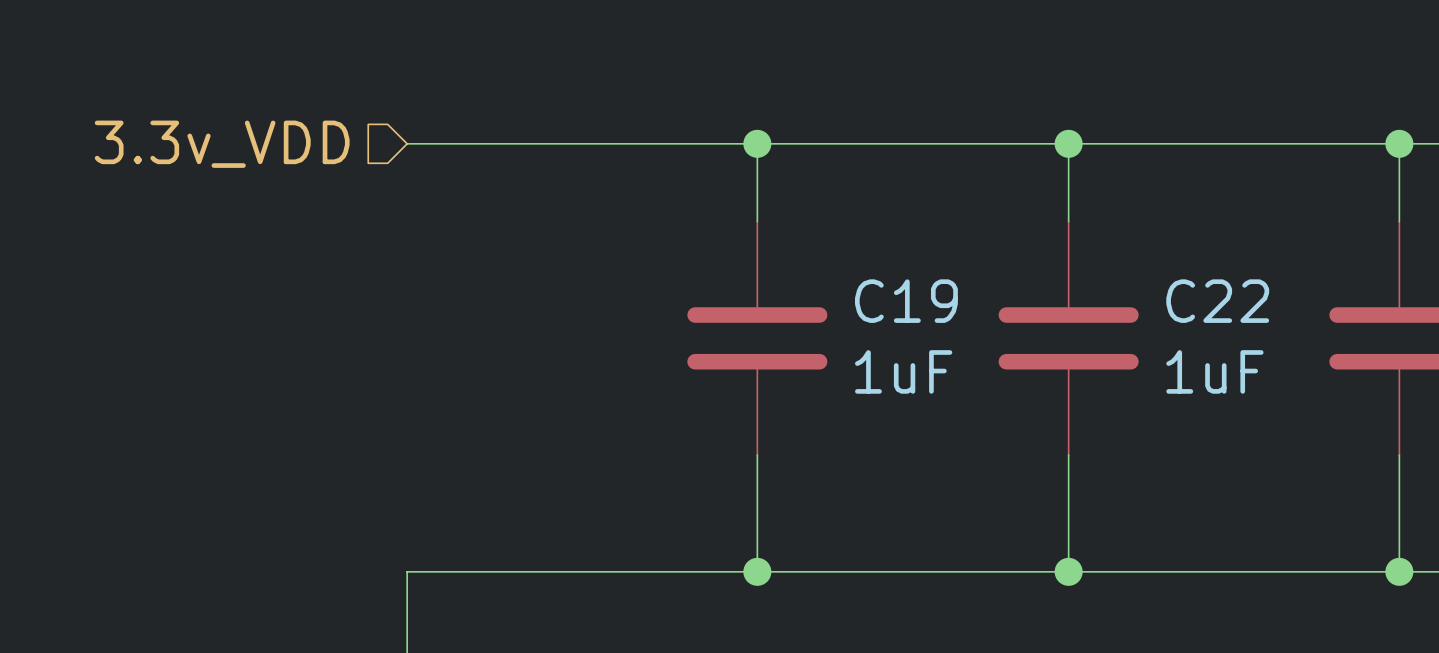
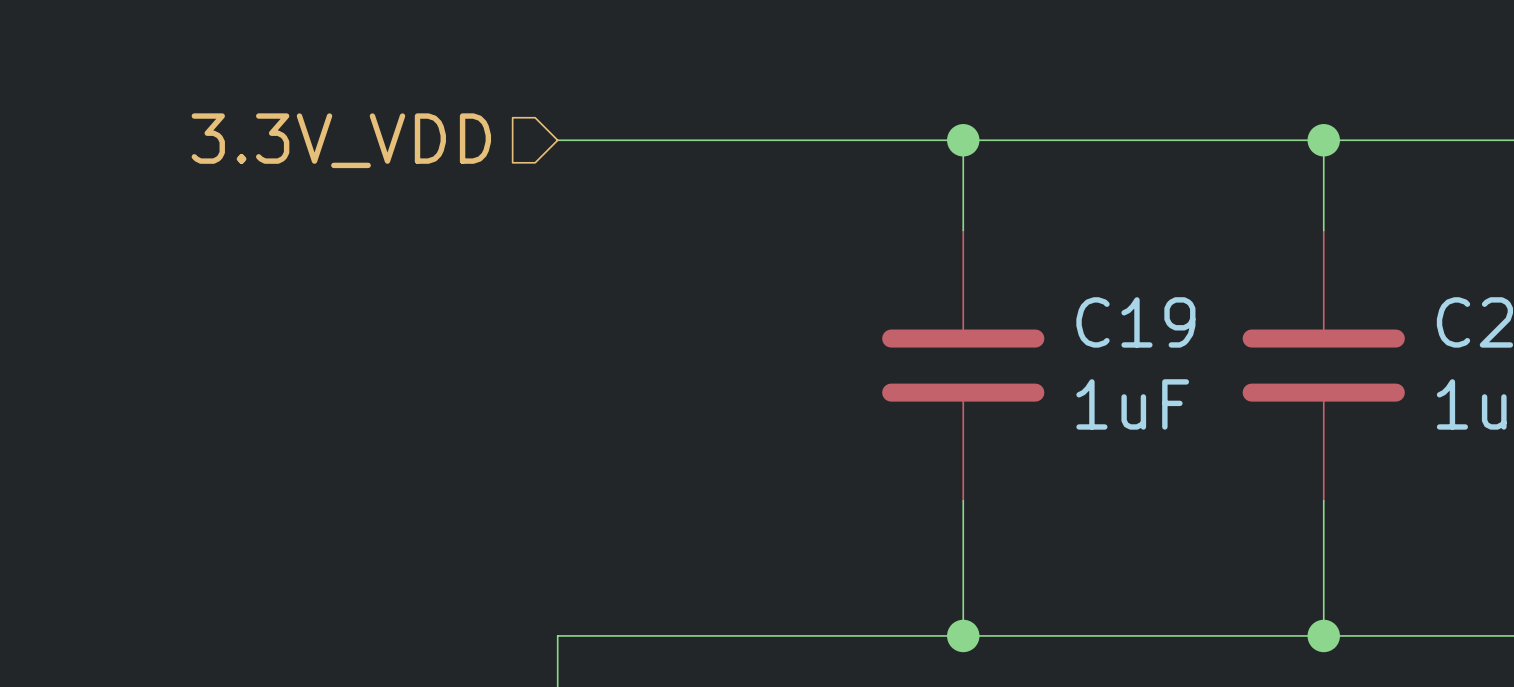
hierarchical label: 3.3v_VDD (222, 144) -> 3.3V_VDD (341, 140)

